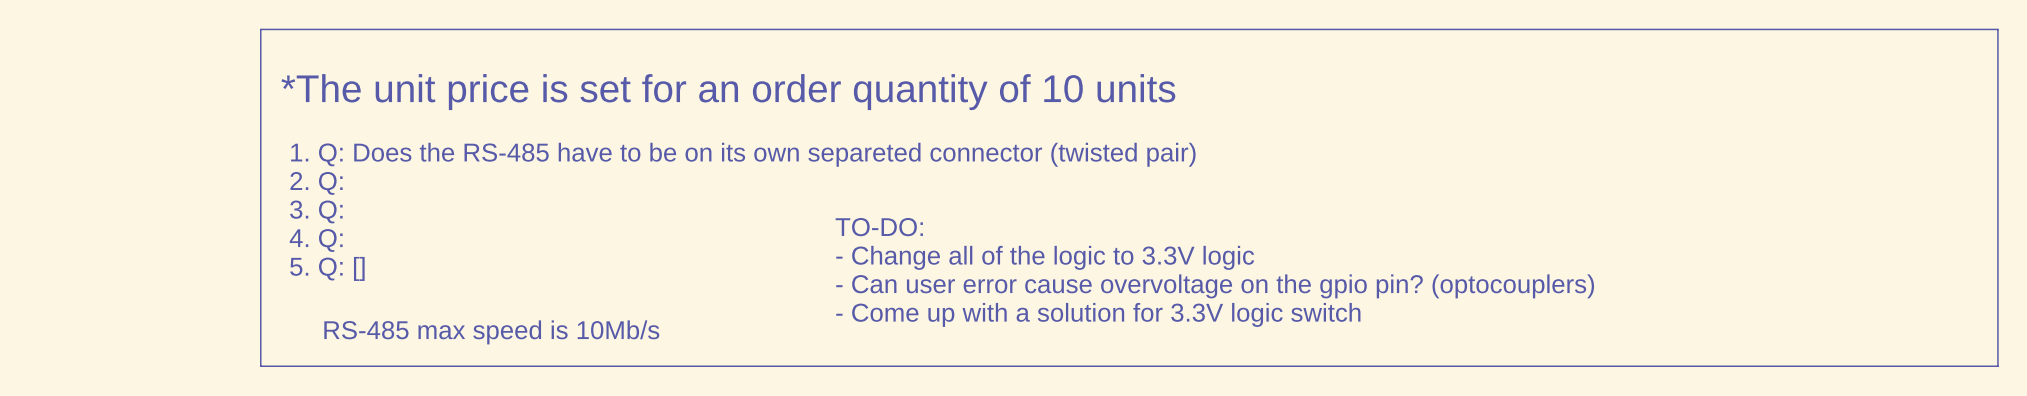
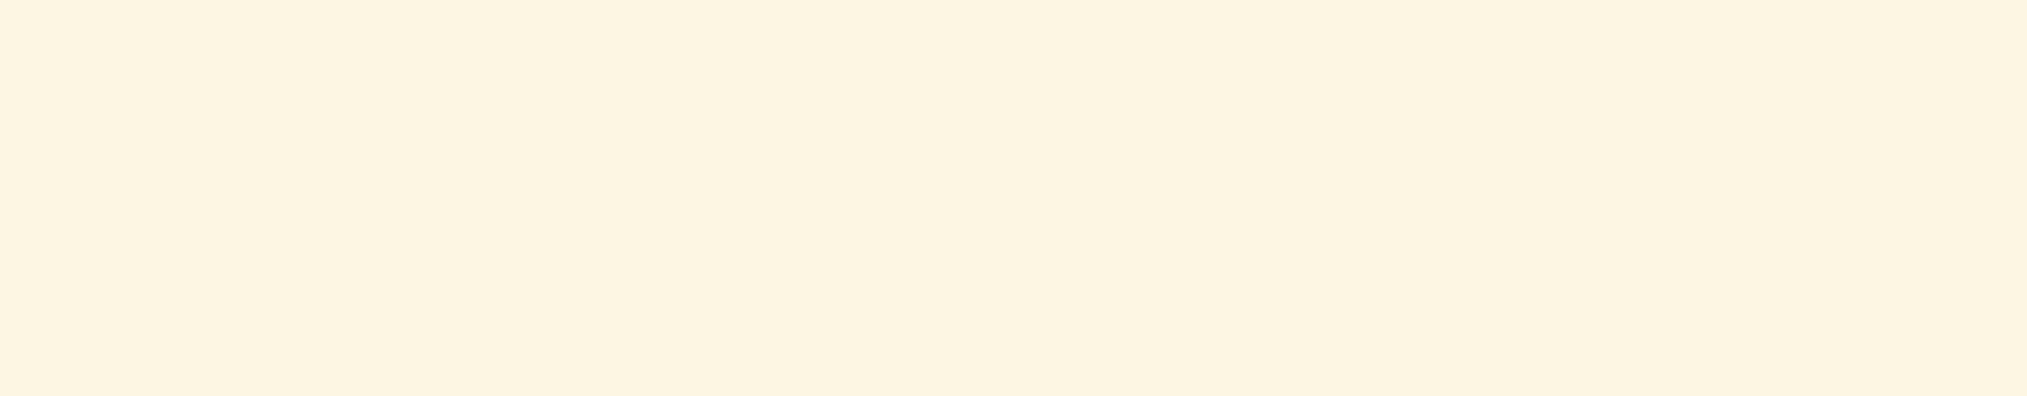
line: (260, 29) (1997, 29) (1997, 366) (260, 366) (260, 29) -> none
text: *The unit price is set for an order quantity of 10 units (728, 92) -> none
text: 1. Q: Does the RS-485 have to be on its own separeted connector (twisted pair) (743, 154) -> none
text: 2. Q: (316, 183) -> none
text: 3. Q: (316, 211) -> none
text: TO-DO: (879, 227) -> none
text: 4. Q: (316, 240) -> none
text: - Change all of the logic to 3.3V logic (1045, 257) -> none
text: 5. Q: [] (327, 268) -> none
text: - Can user error cause overvoltage on the gpio pin? (optocouplers) (1215, 286) -> none
text: - Come up with a solution for 3.3V logic switch (1098, 314) -> none
text: RS-485 max speed is 10Mb/s (491, 332) -> none

